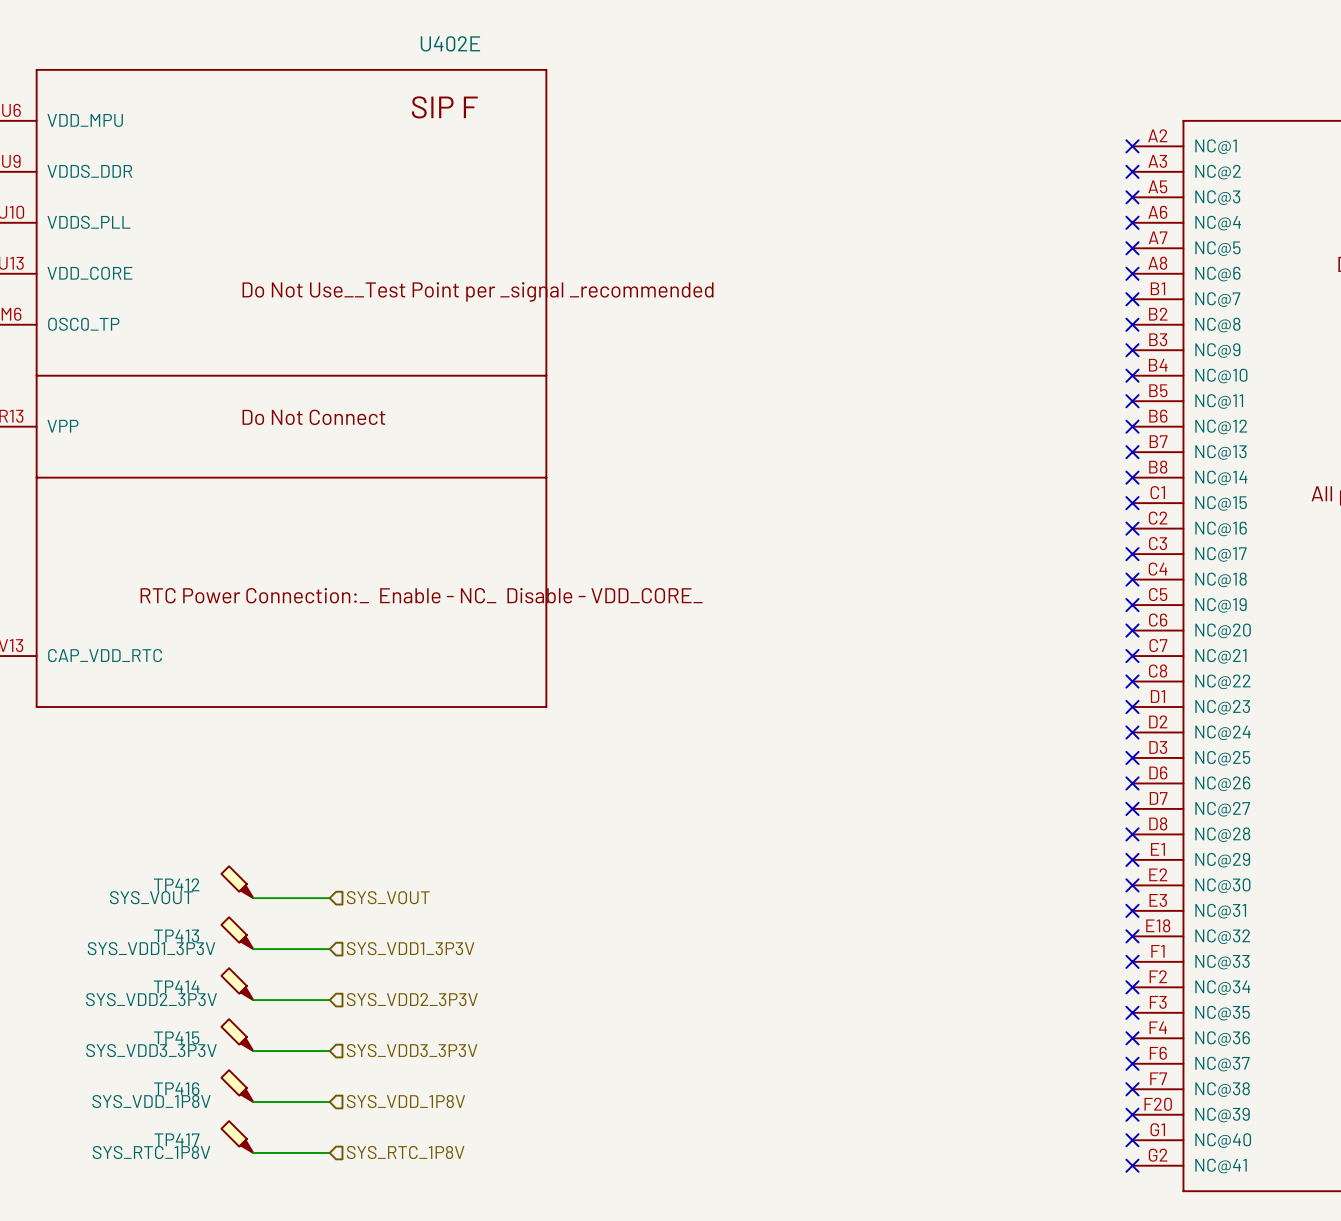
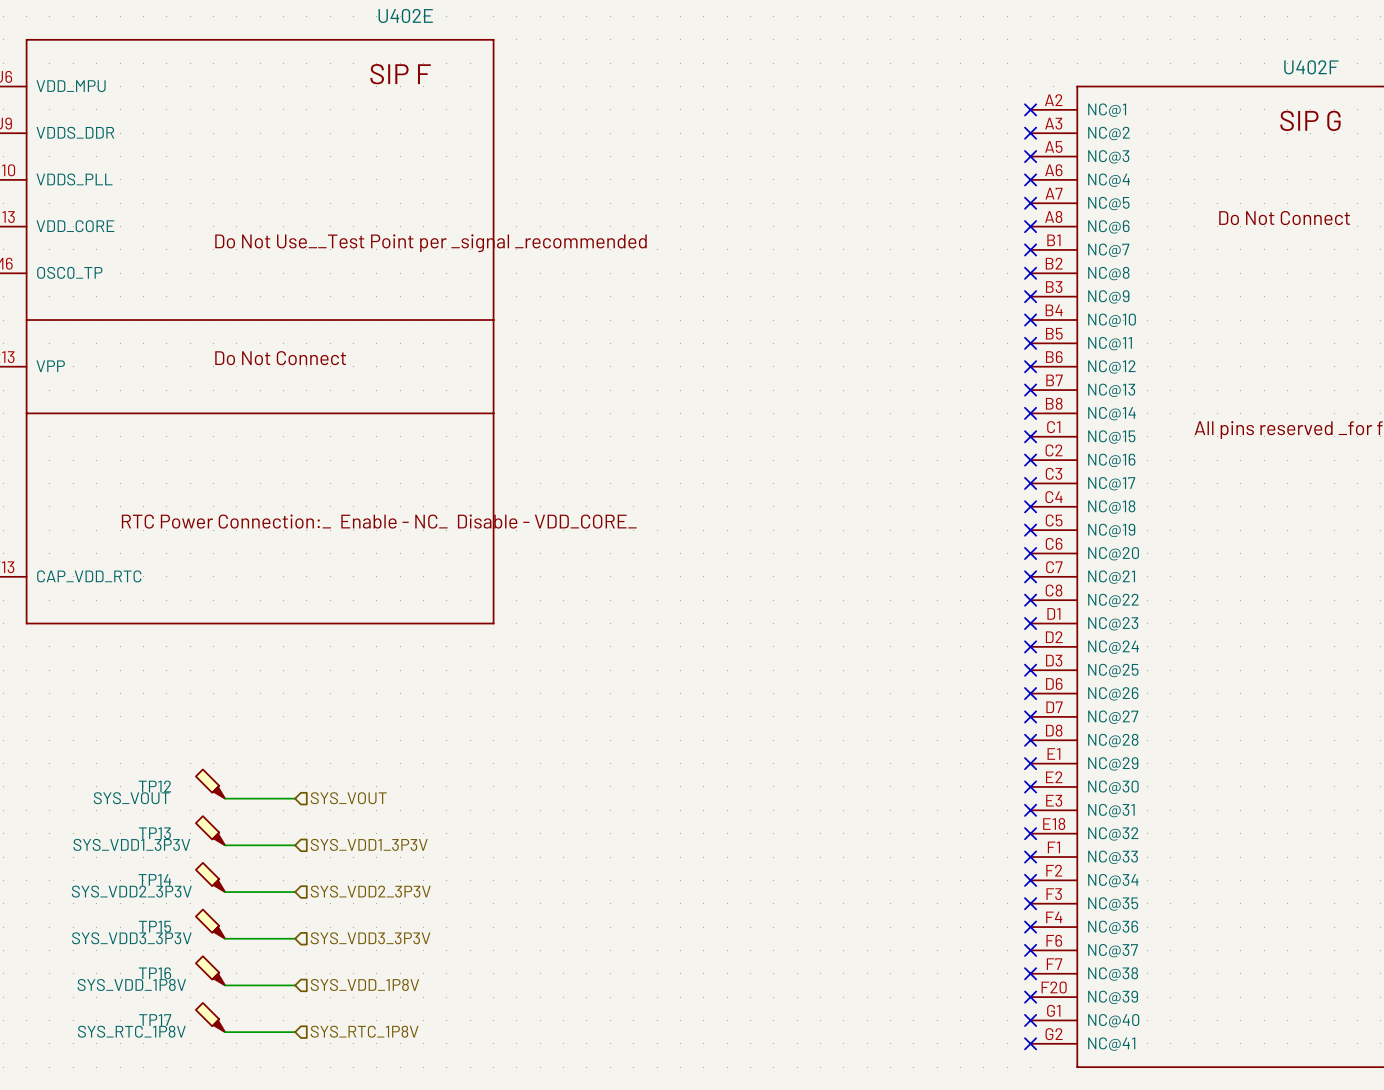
TP412 name: TP412 (176, 884) -> TP12 (154, 786)
TP413 name: TP413 (176, 935) -> TP13 (154, 833)
TP414 name: TP414 (176, 986) -> TP14 (154, 879)
TP415 name: TP415 (176, 1037) -> TP15 (154, 926)
TP416 name: TP416 (176, 1088) -> TP16 (154, 973)
TP417 name: TP417 (177, 1139) -> TP17 (155, 1020)

